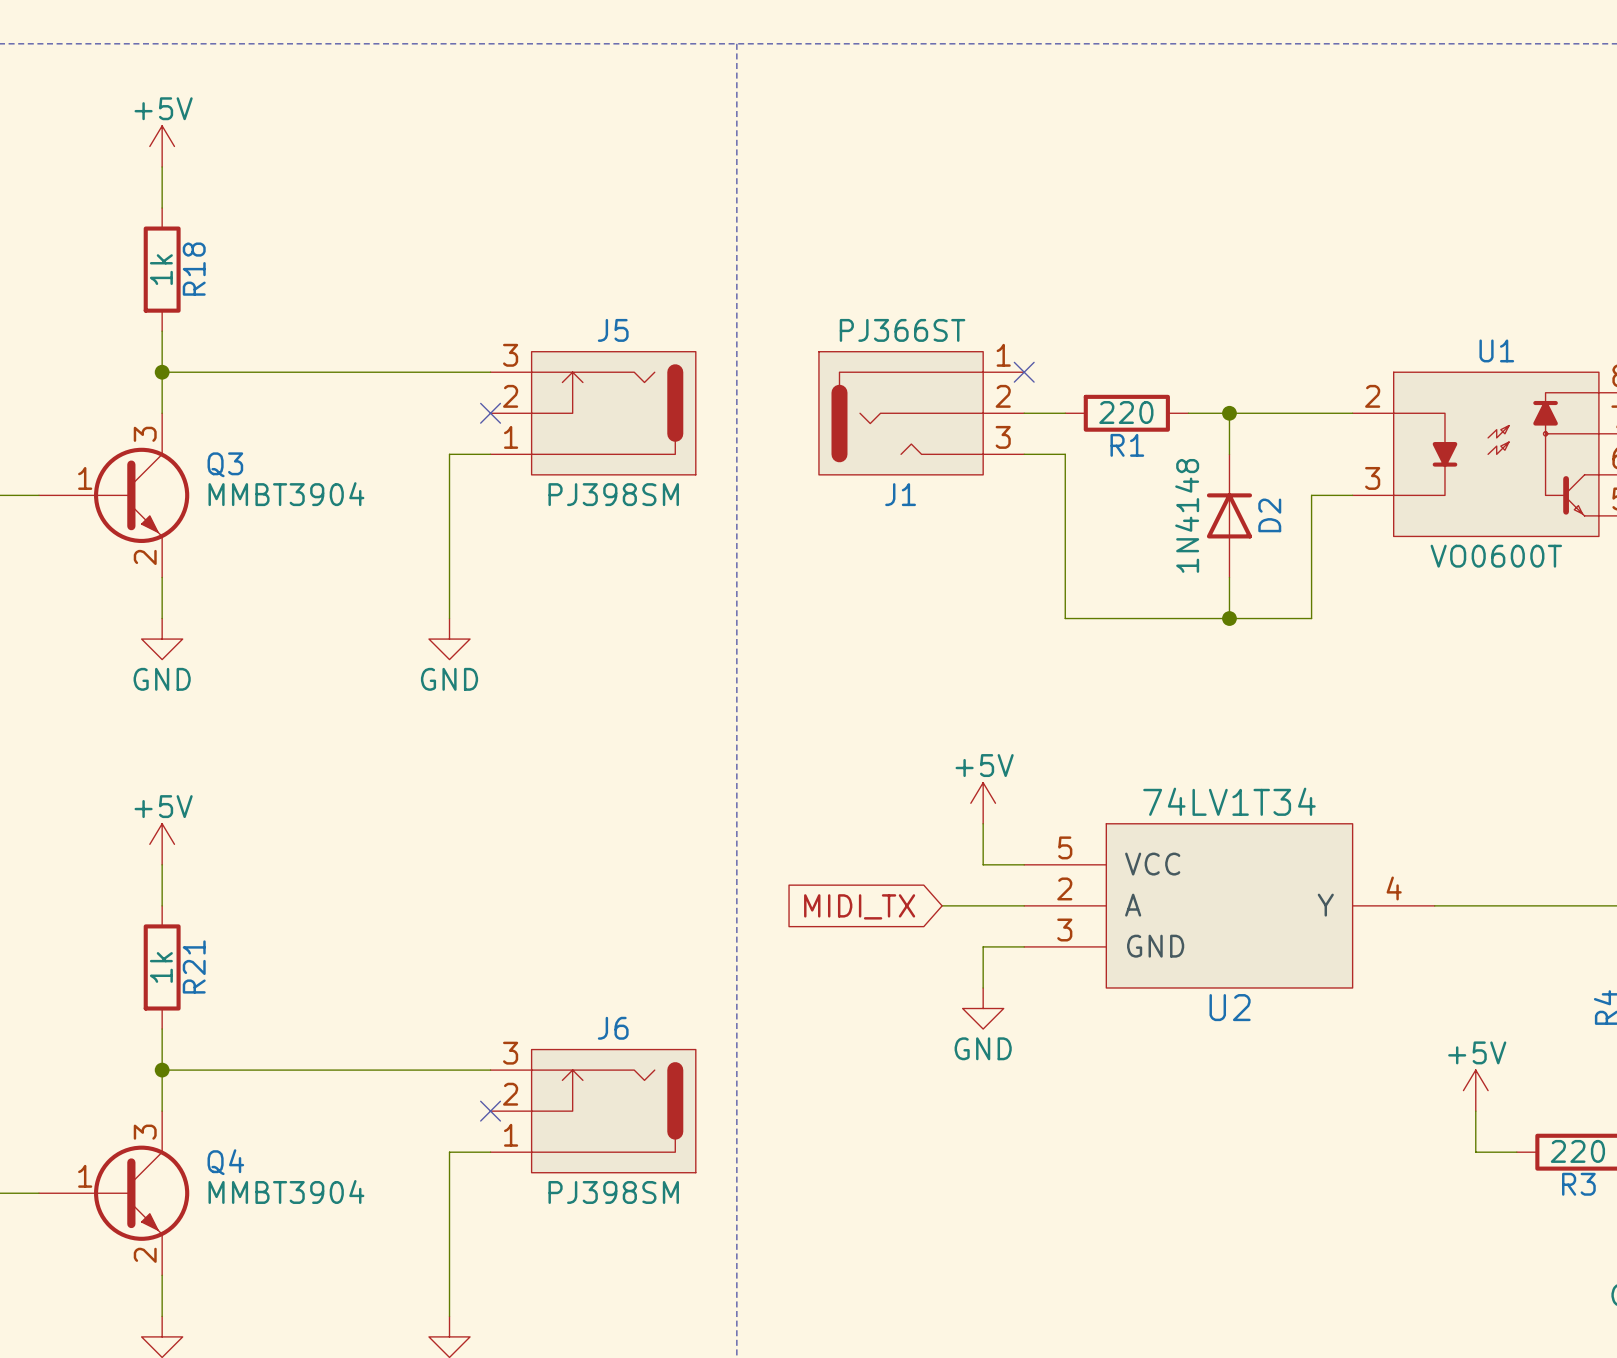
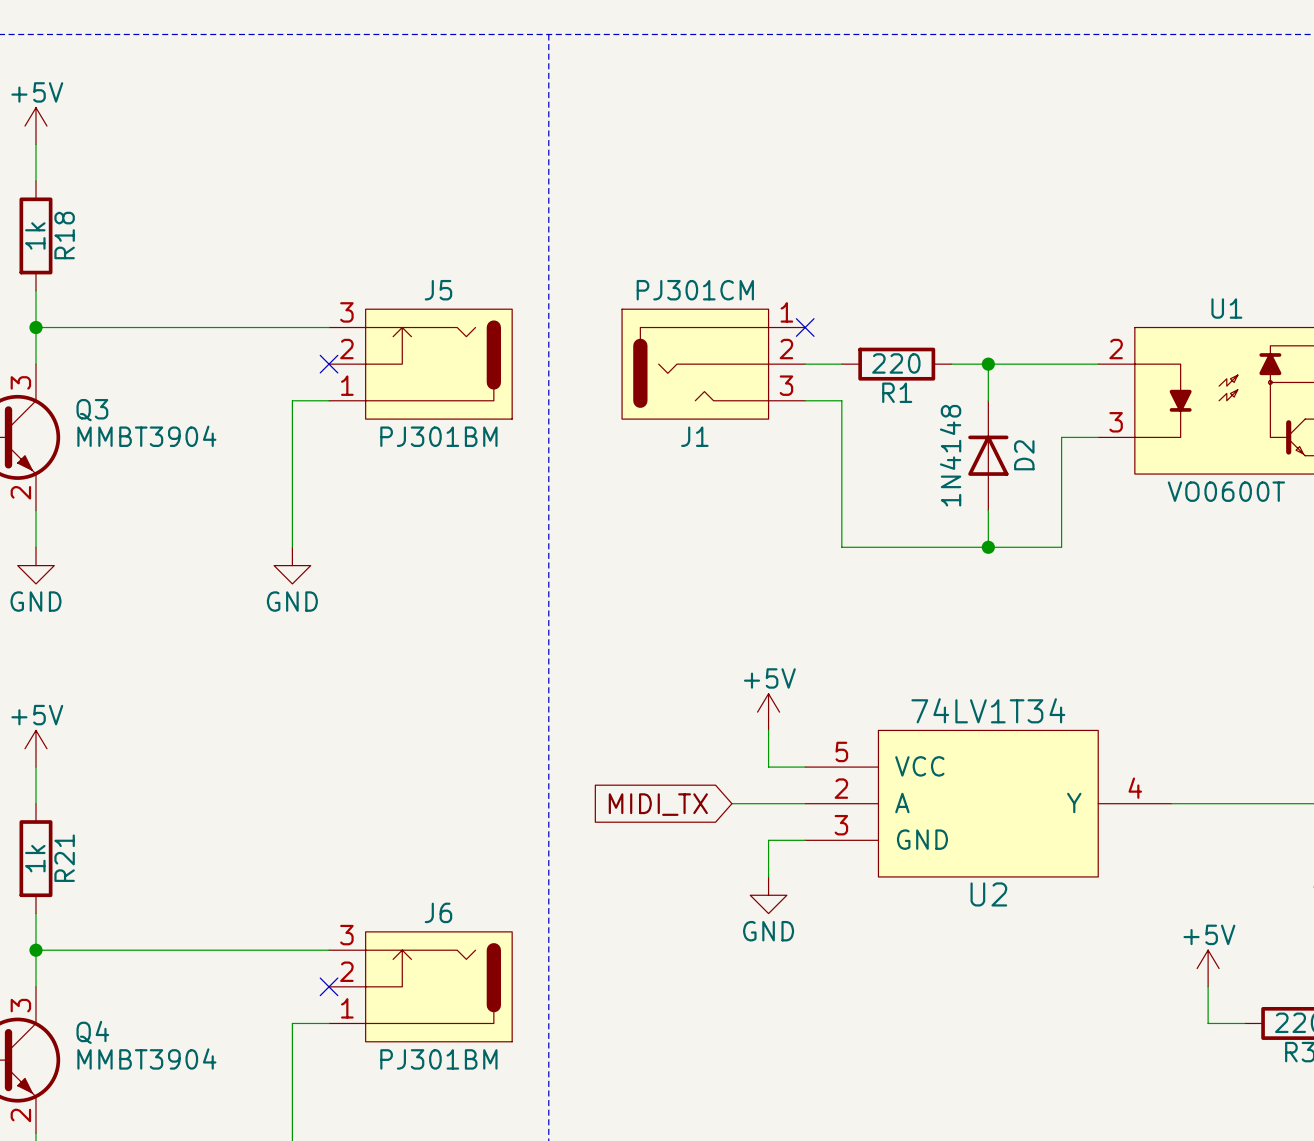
J1 value: PJ366ST (902, 330) -> PJ301CM (695, 290)
J5 value: PJ398SM (613, 494) -> PJ301BM (438, 436)
J6 value: PJ398SM (613, 1192) -> PJ301BM (438, 1059)

